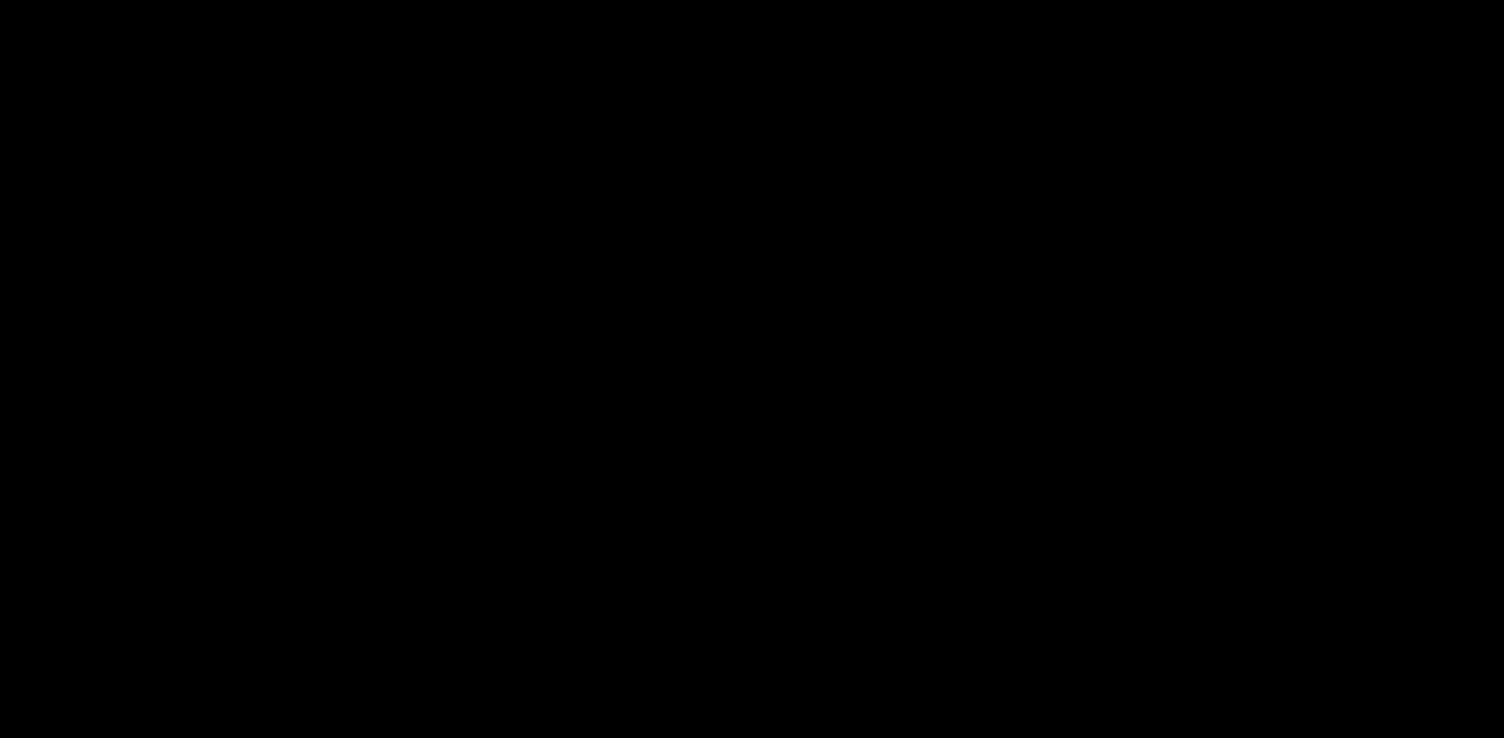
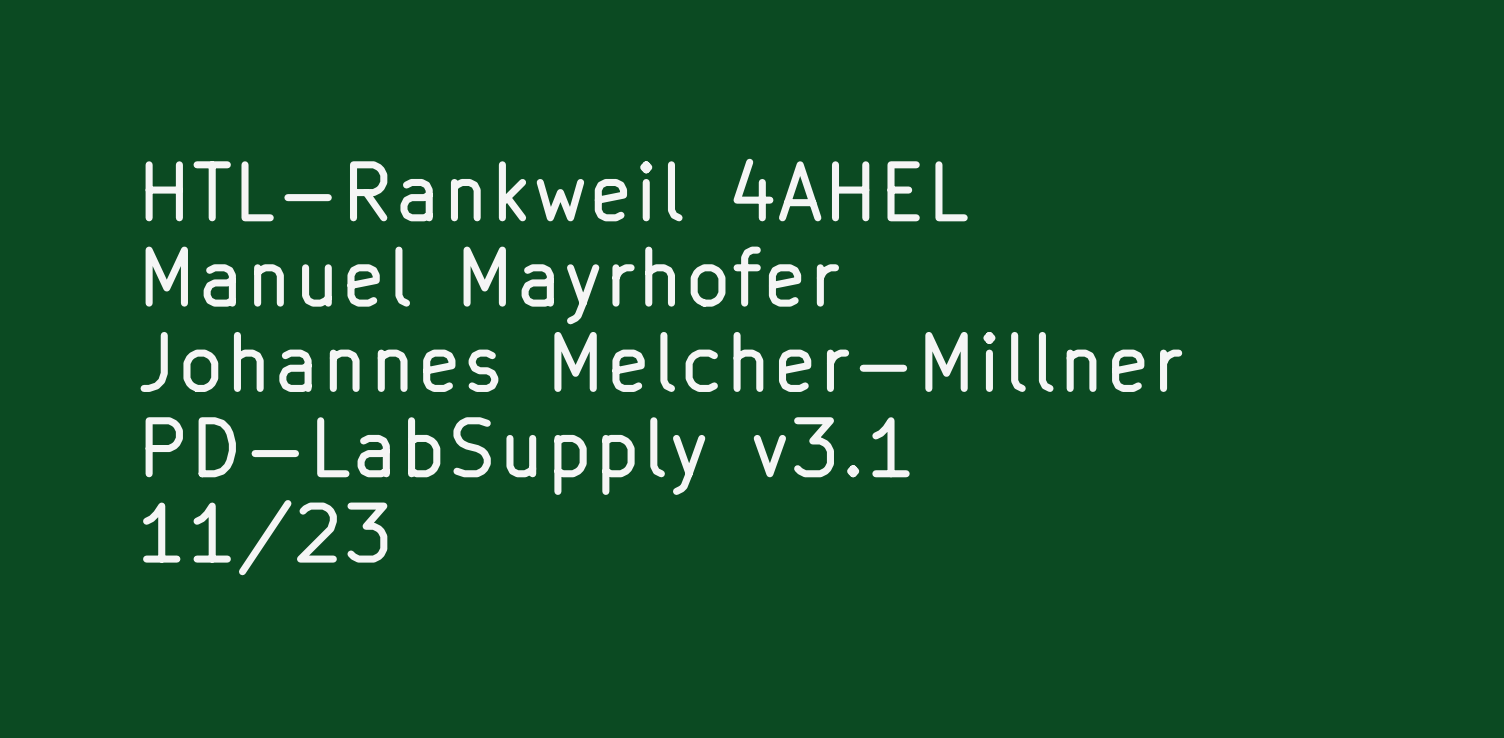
text: none -> HTL-Rankweil 4AHEL (556, 190)
text: none -> Manuel Mayrhofer (492, 285)
text: none -> Johannes Melcher-Millner (661, 361)
text: none -> PD-LabSupply v3.1 (527, 456)
text: none -> 11/23 (265, 537)

